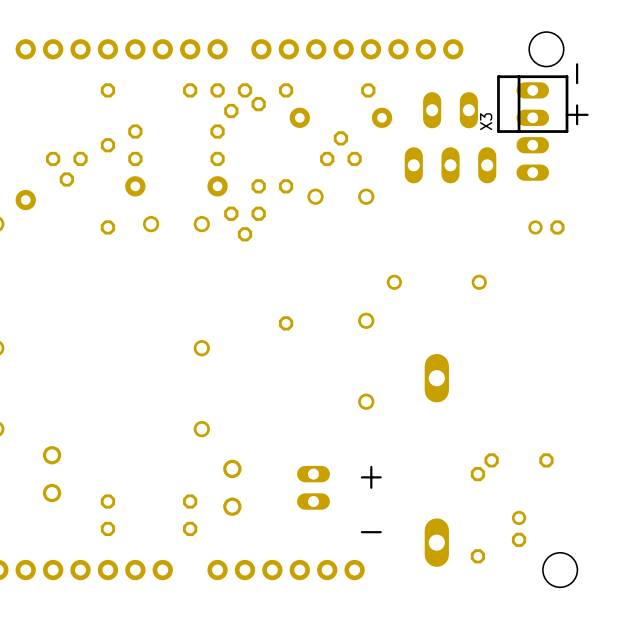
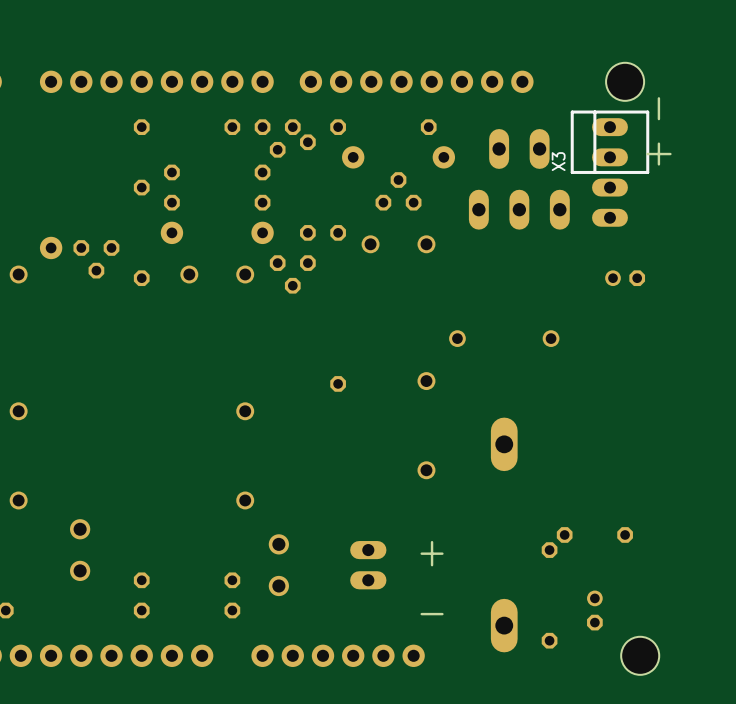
part position: (66, 169) -> (96, 259)

